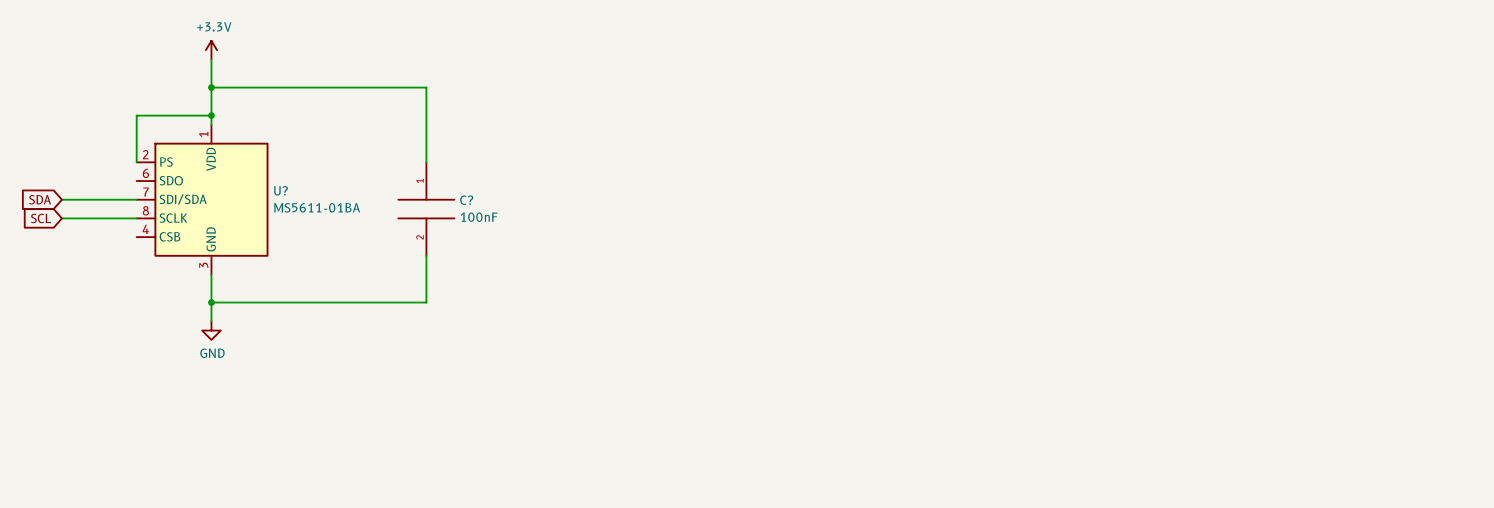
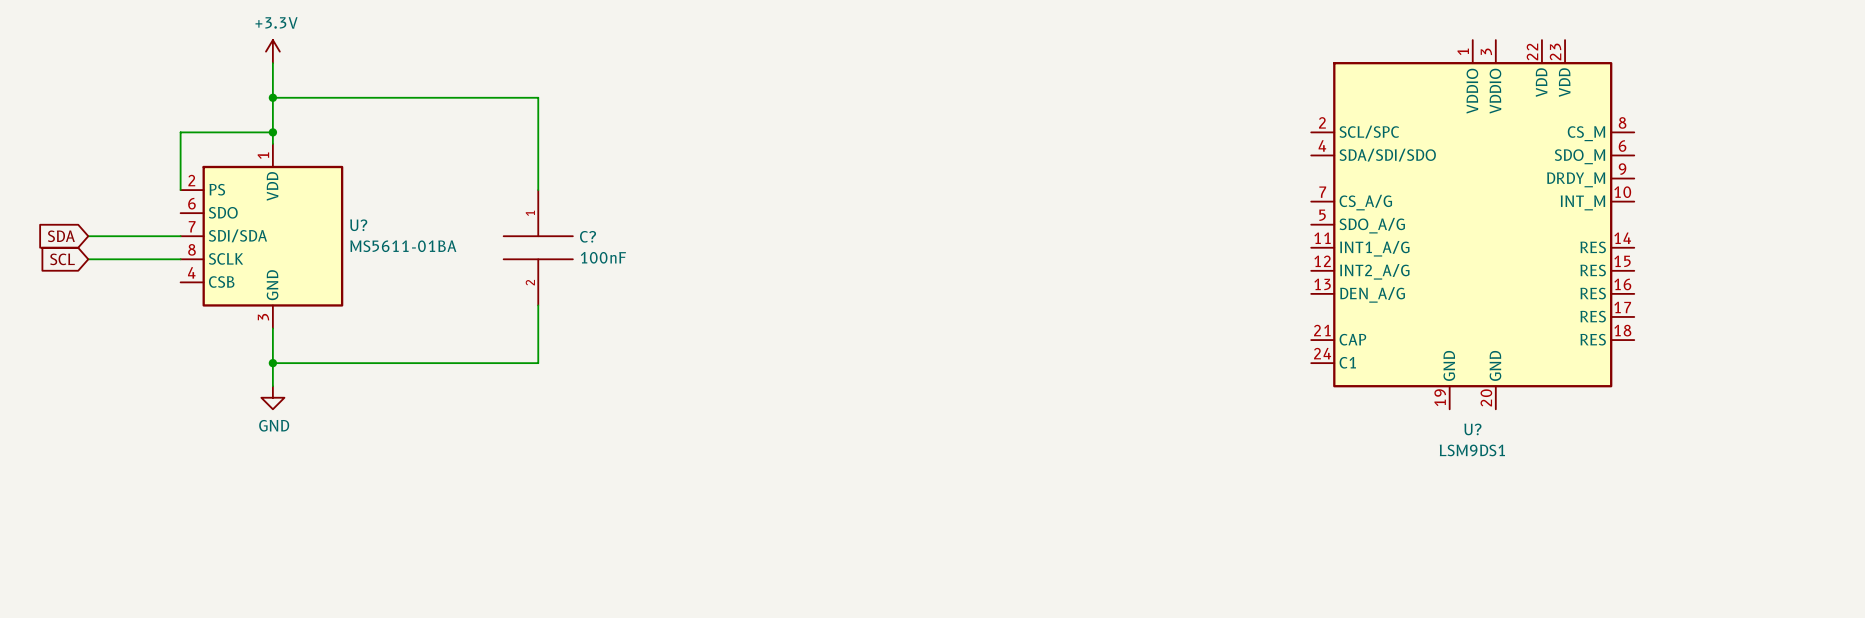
U?: none -> LSM9DS1 (1472, 224)

